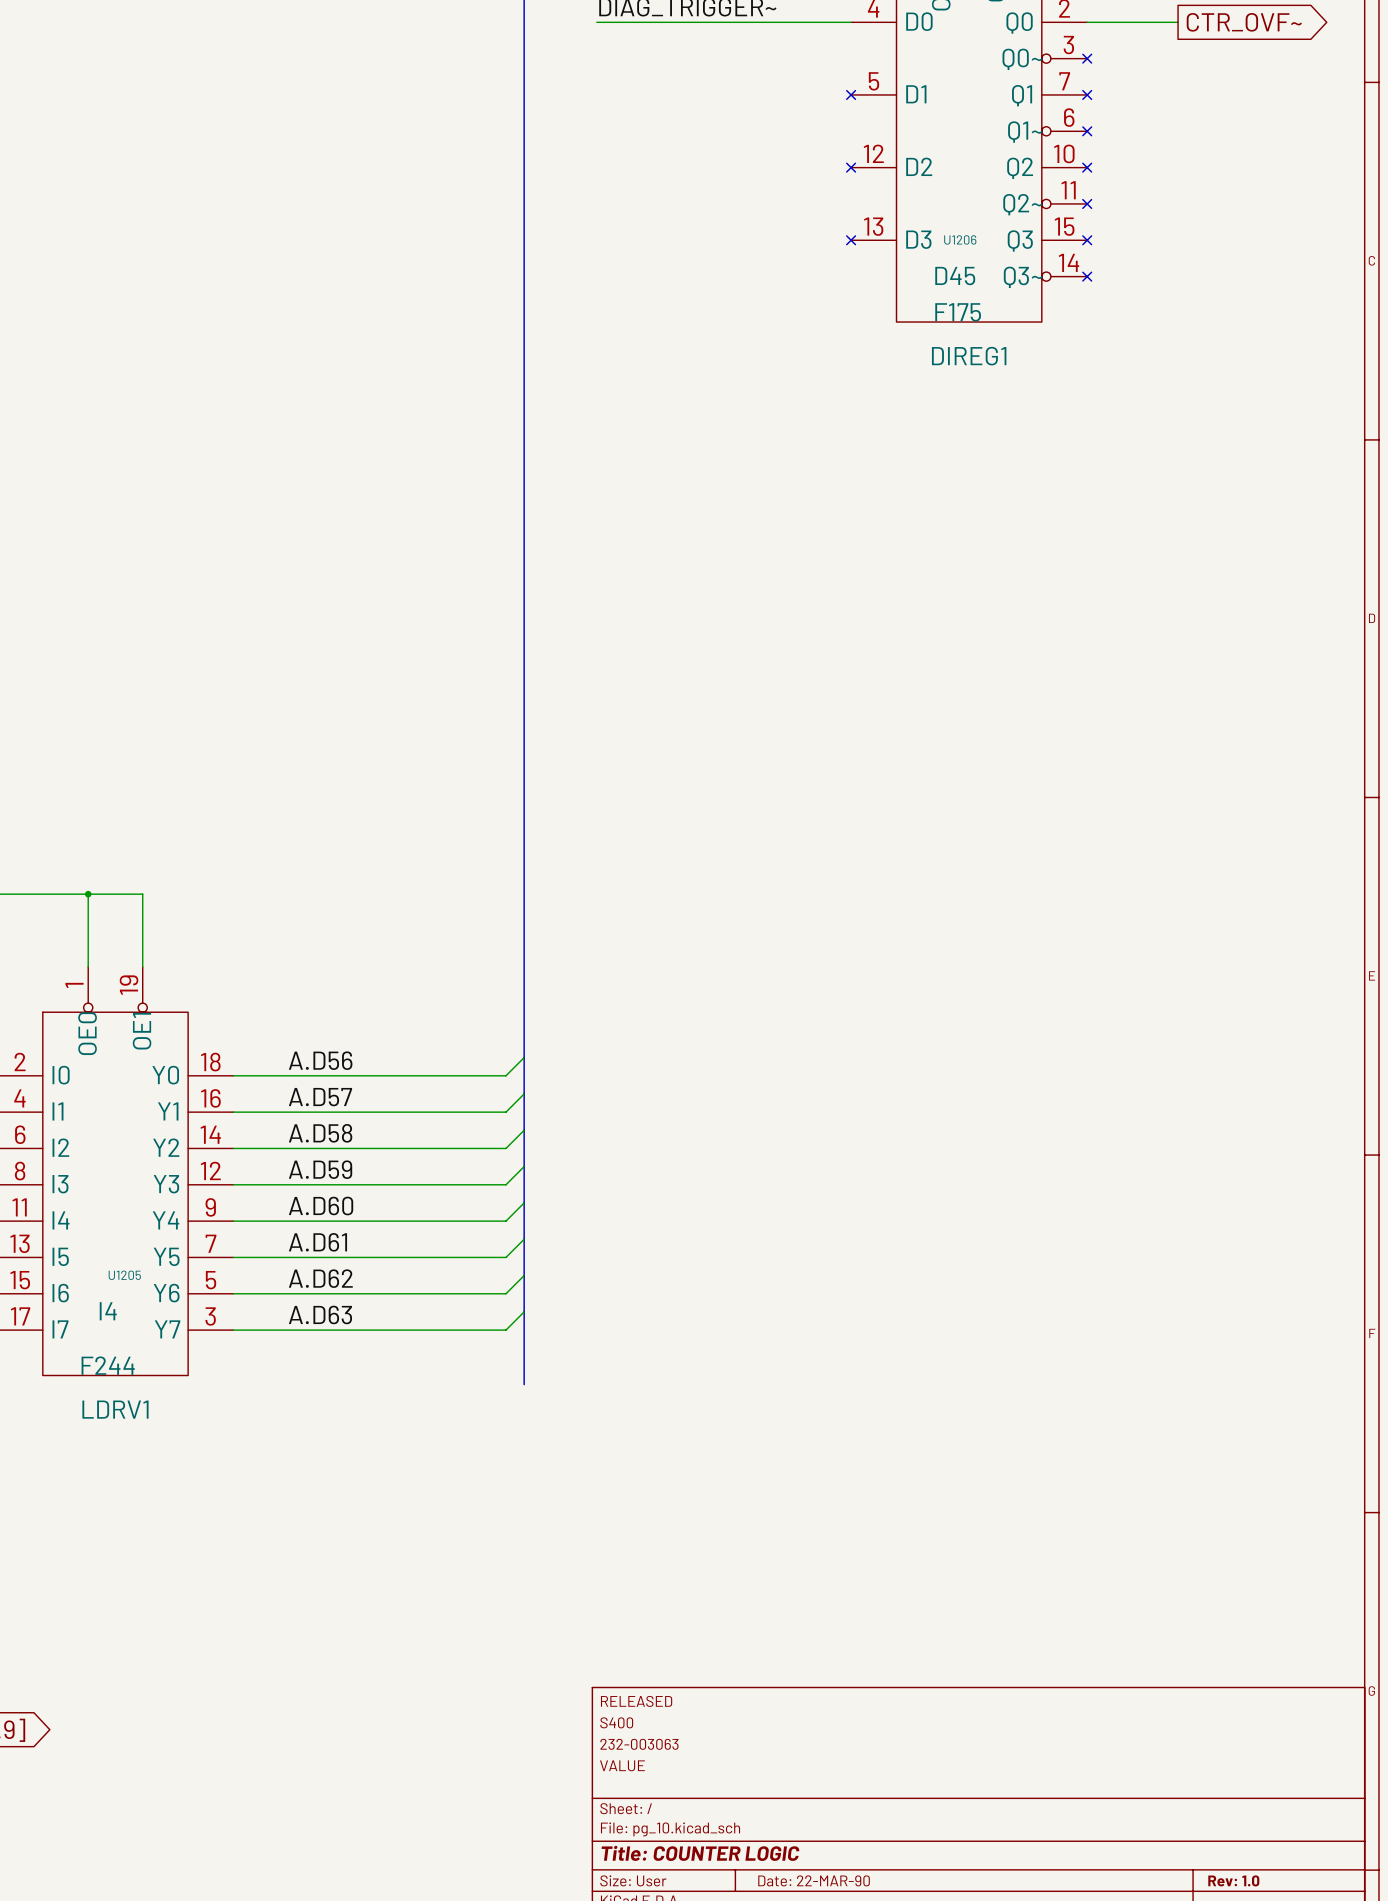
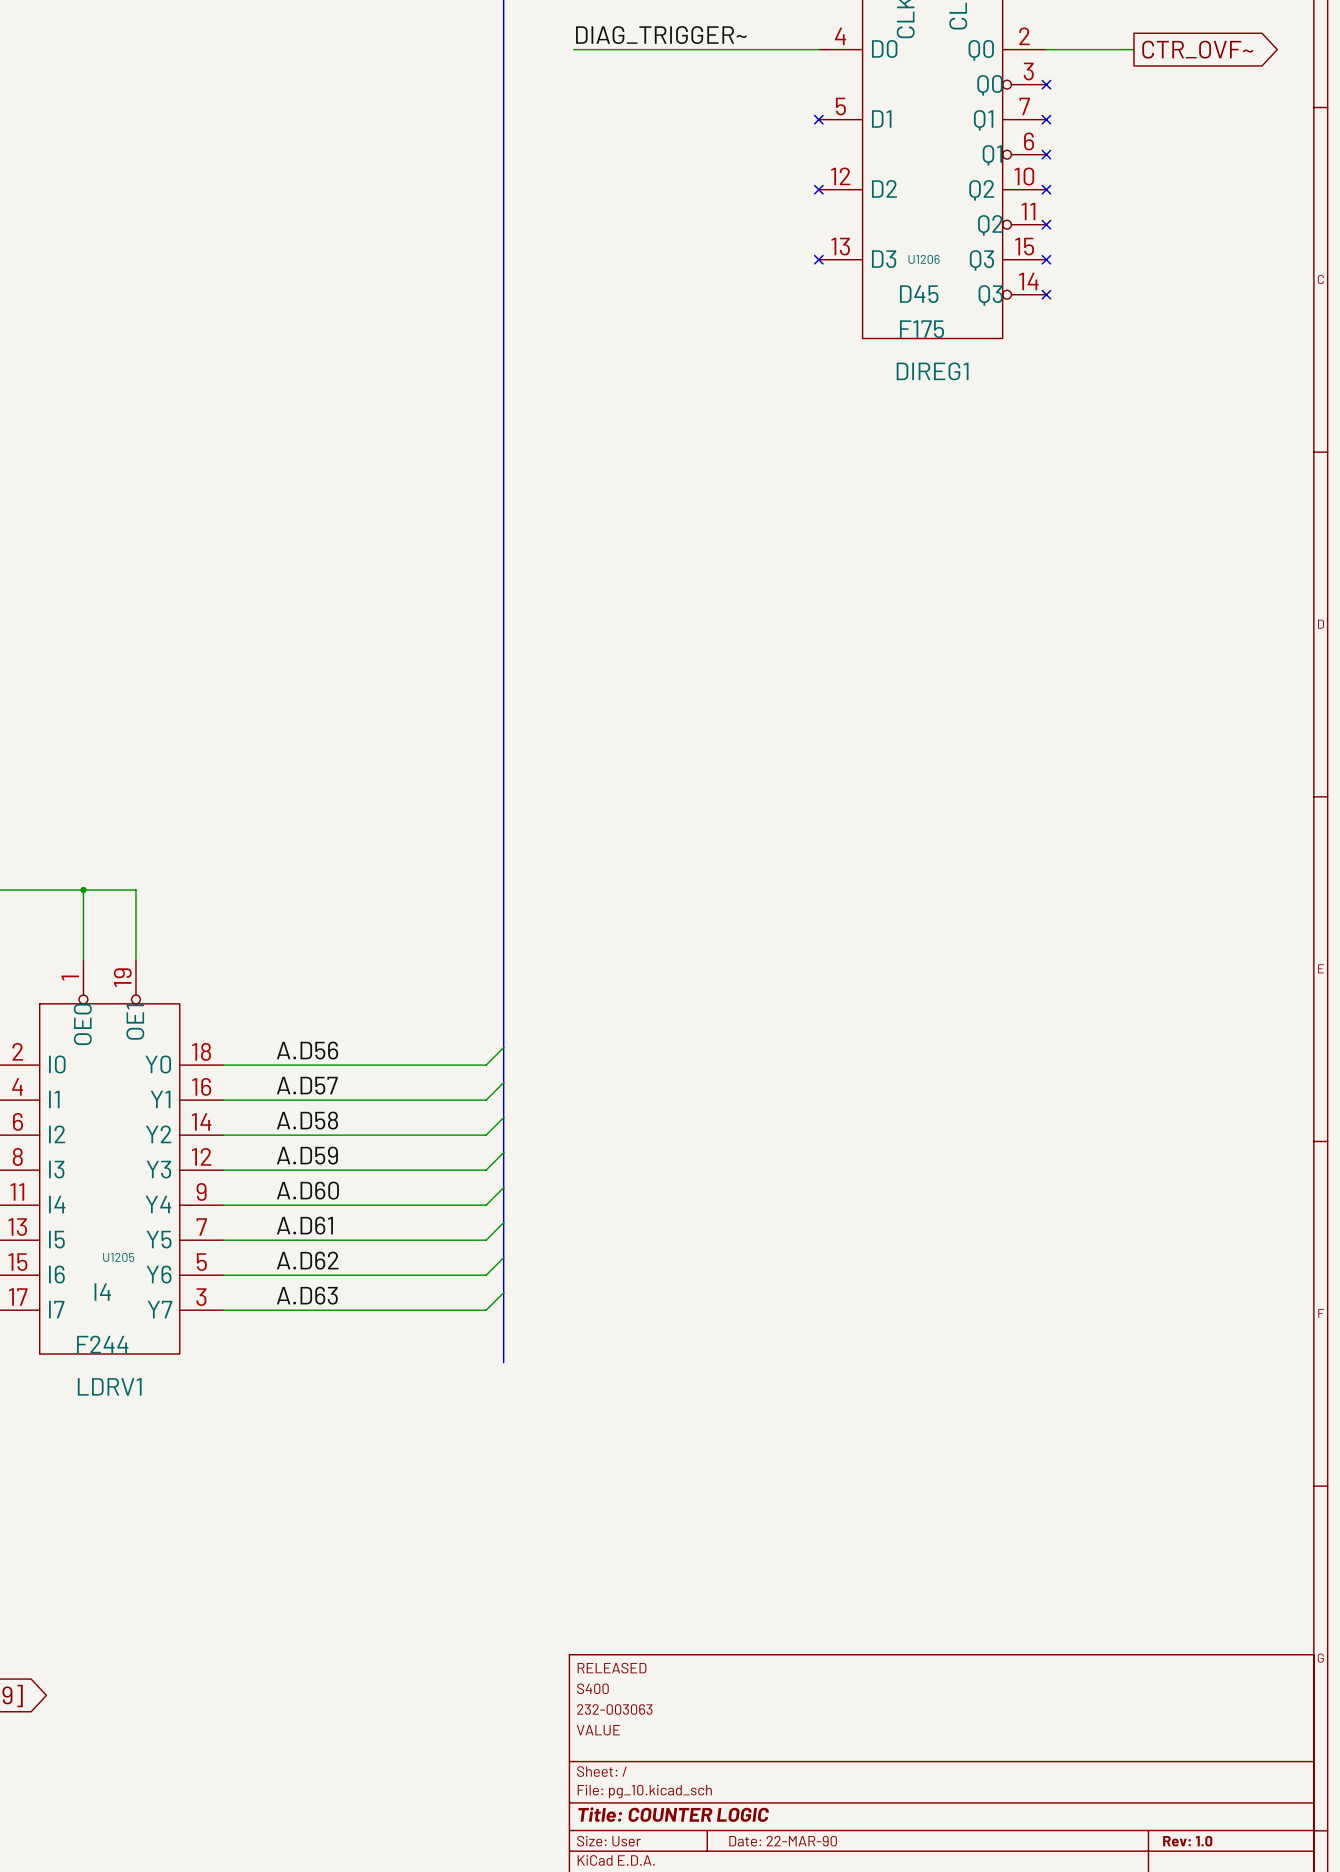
U1206 pin name: Q0~ (1022, 59) -> Q0 (989, 85)
U1206 pin name: Q1~ (1025, 132) -> Q1 (992, 155)
U1206 pin name: Q2~ (1022, 204) -> Q2 (990, 225)
U1206 pin name: Q3~ (1023, 277) -> Q3 (990, 295)

